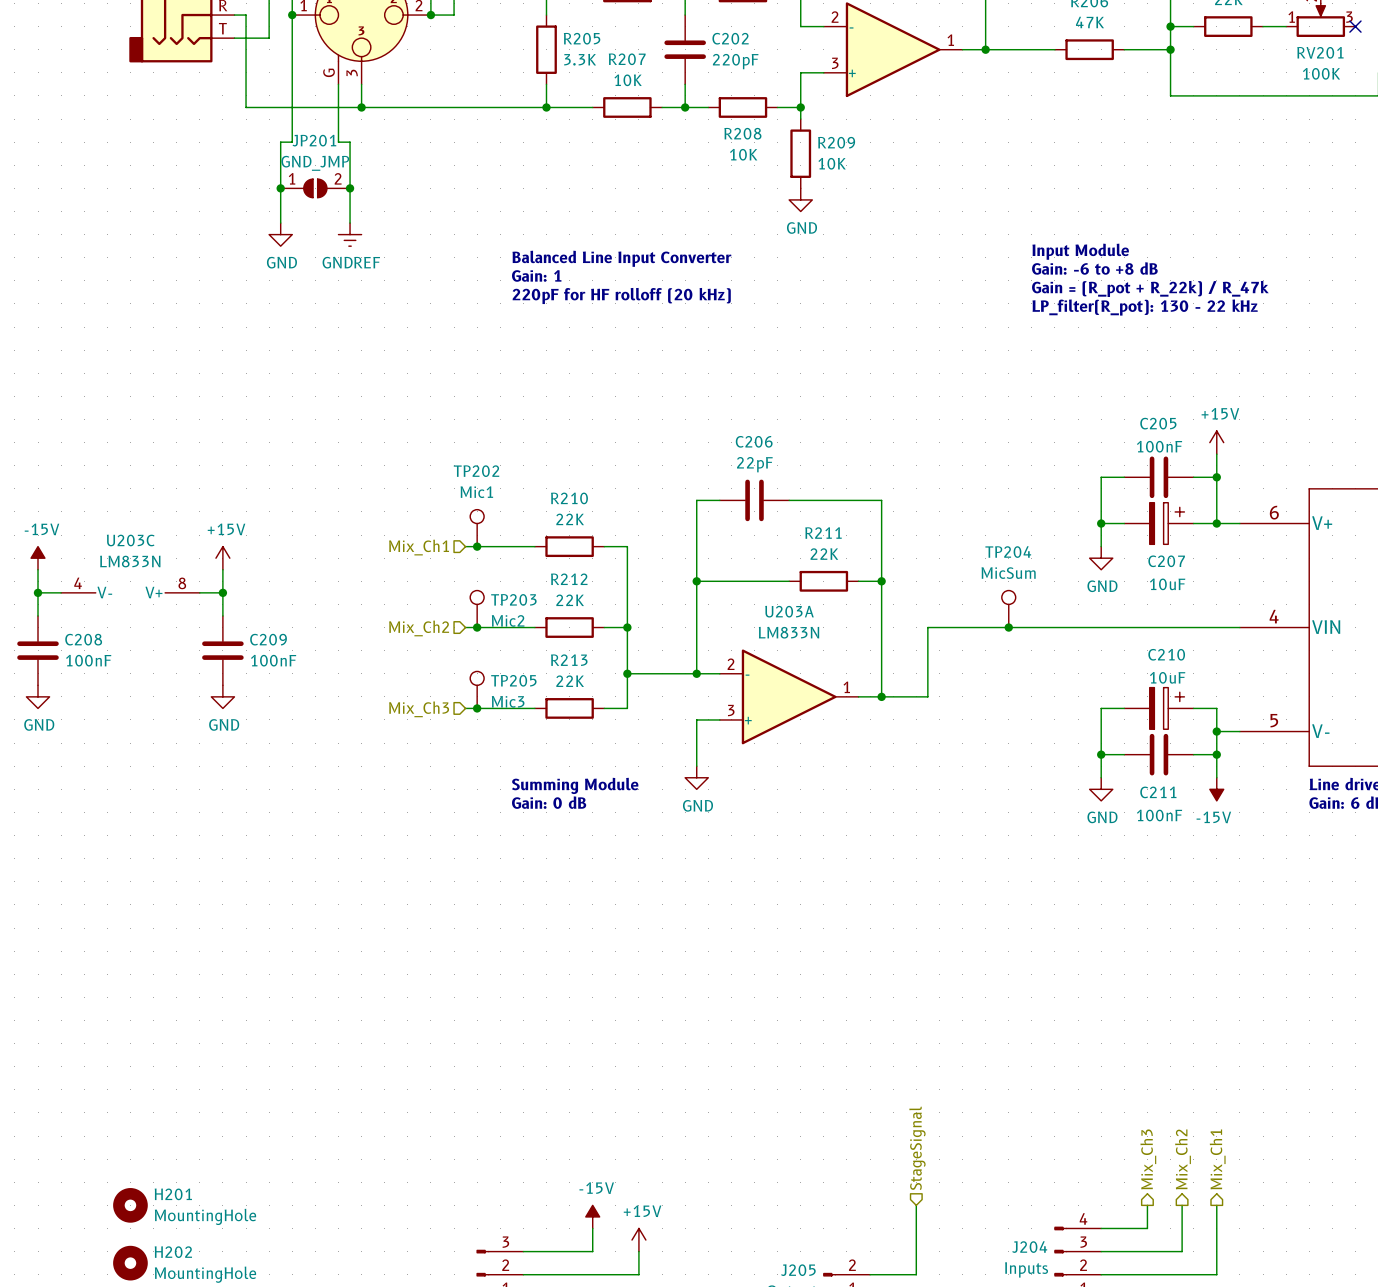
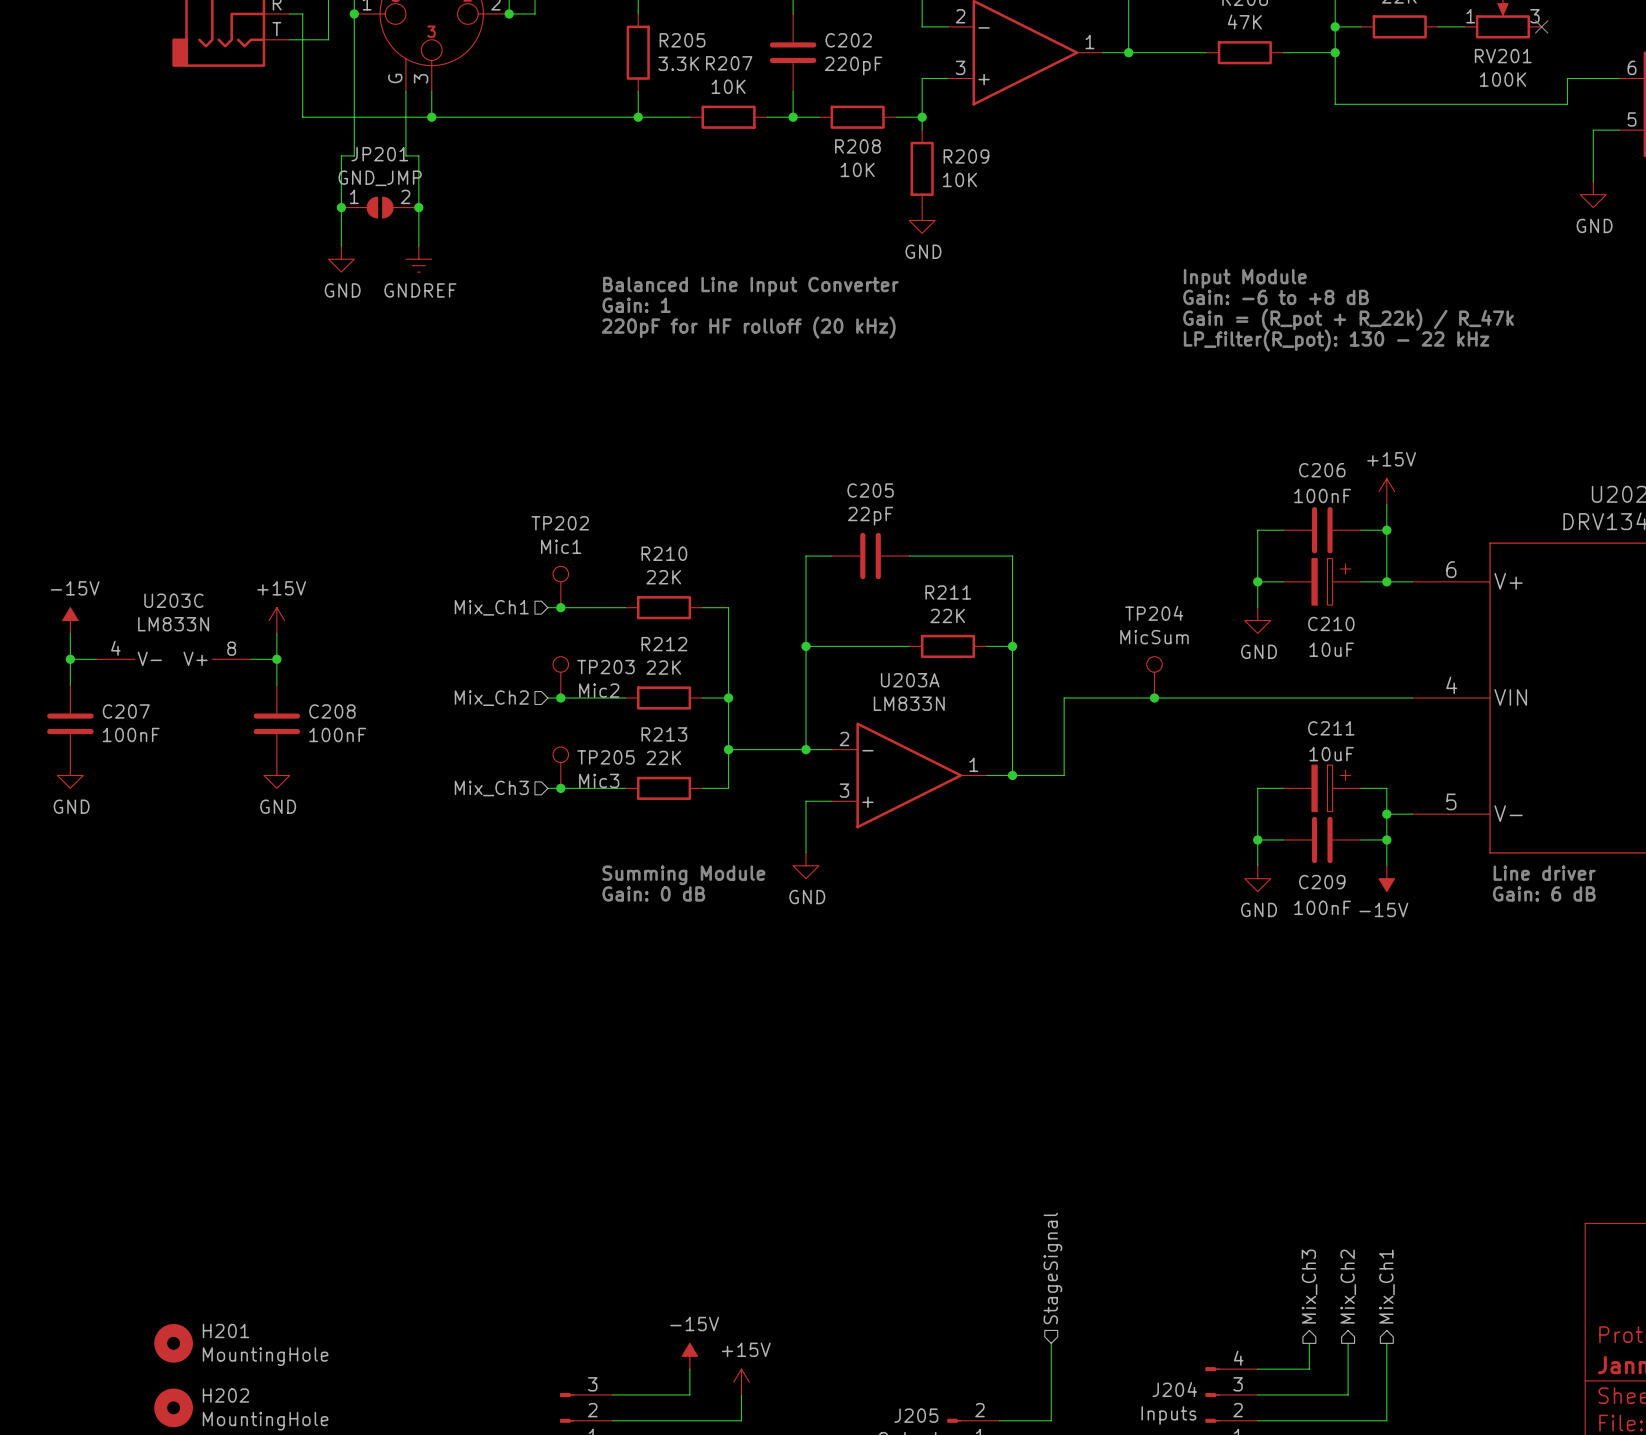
C205 name: C205 (1158, 423) -> C206 (1322, 470)
C206 name: C206 (754, 441) -> C205 (870, 490)
C207 name: C207 (1166, 561) -> C210 (1331, 623)
C208 name: C208 (83, 639) -> C207 (126, 711)
C209 name: C209 (268, 639) -> C208 (332, 711)
C210 name: C210 (1166, 654) -> C211 (1331, 728)
C211 name: C211 (1158, 792) -> C209 (1322, 882)

